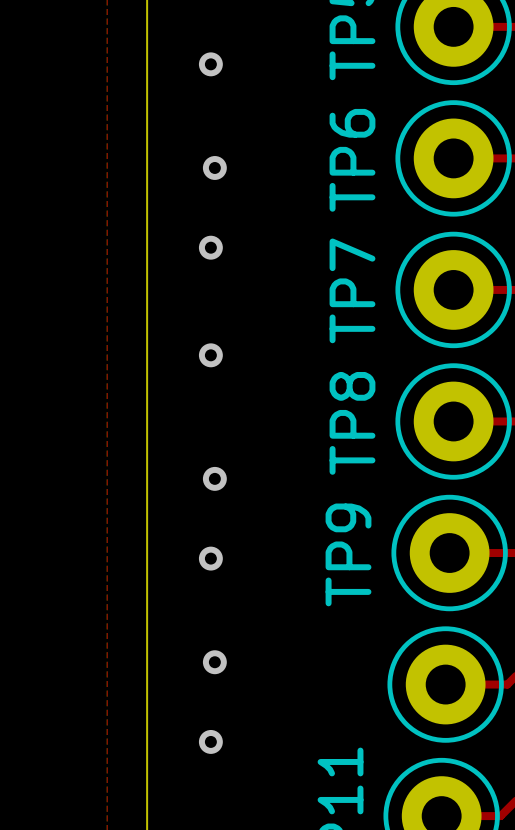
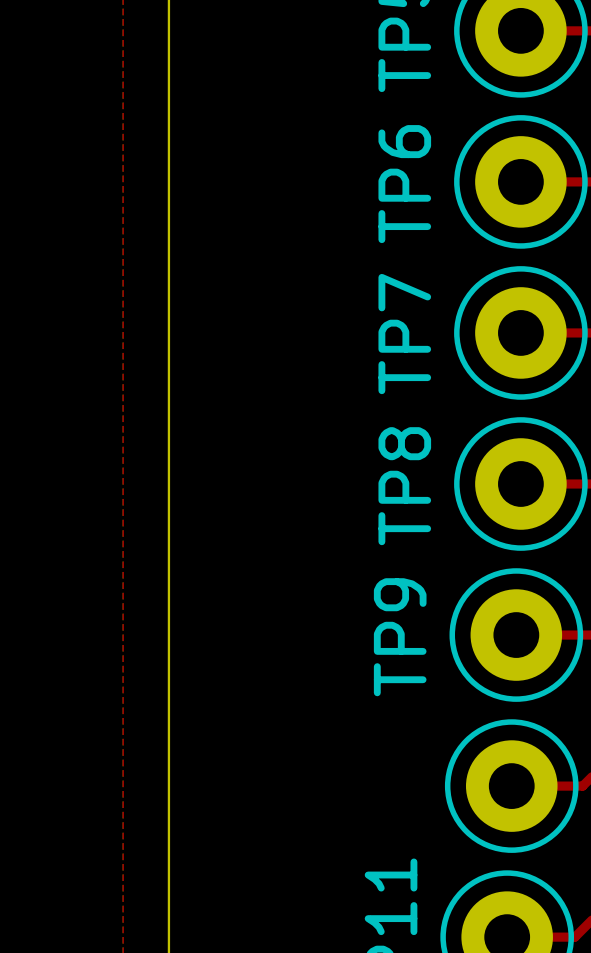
via: (210, 64) -> none
via: (214, 167) -> none
via: (210, 247) -> none
via: (210, 355) -> none
via: (214, 478) -> none
via: (210, 558) -> none
via: (214, 662) -> none
via: (210, 741) -> none

